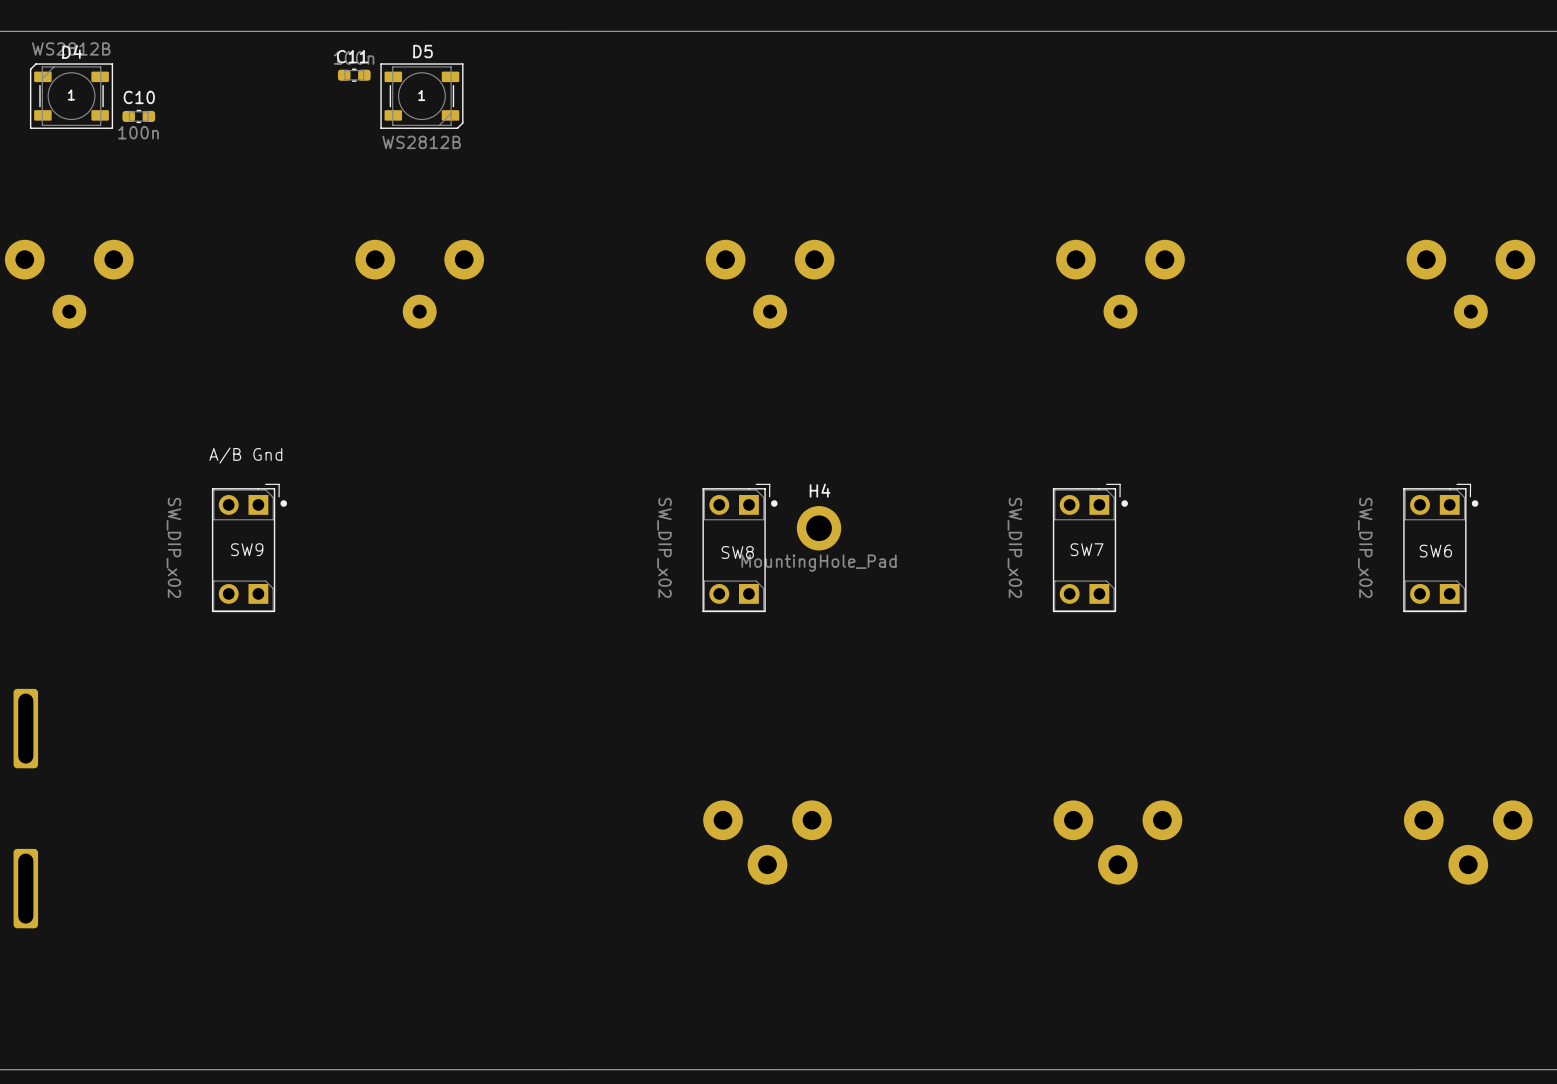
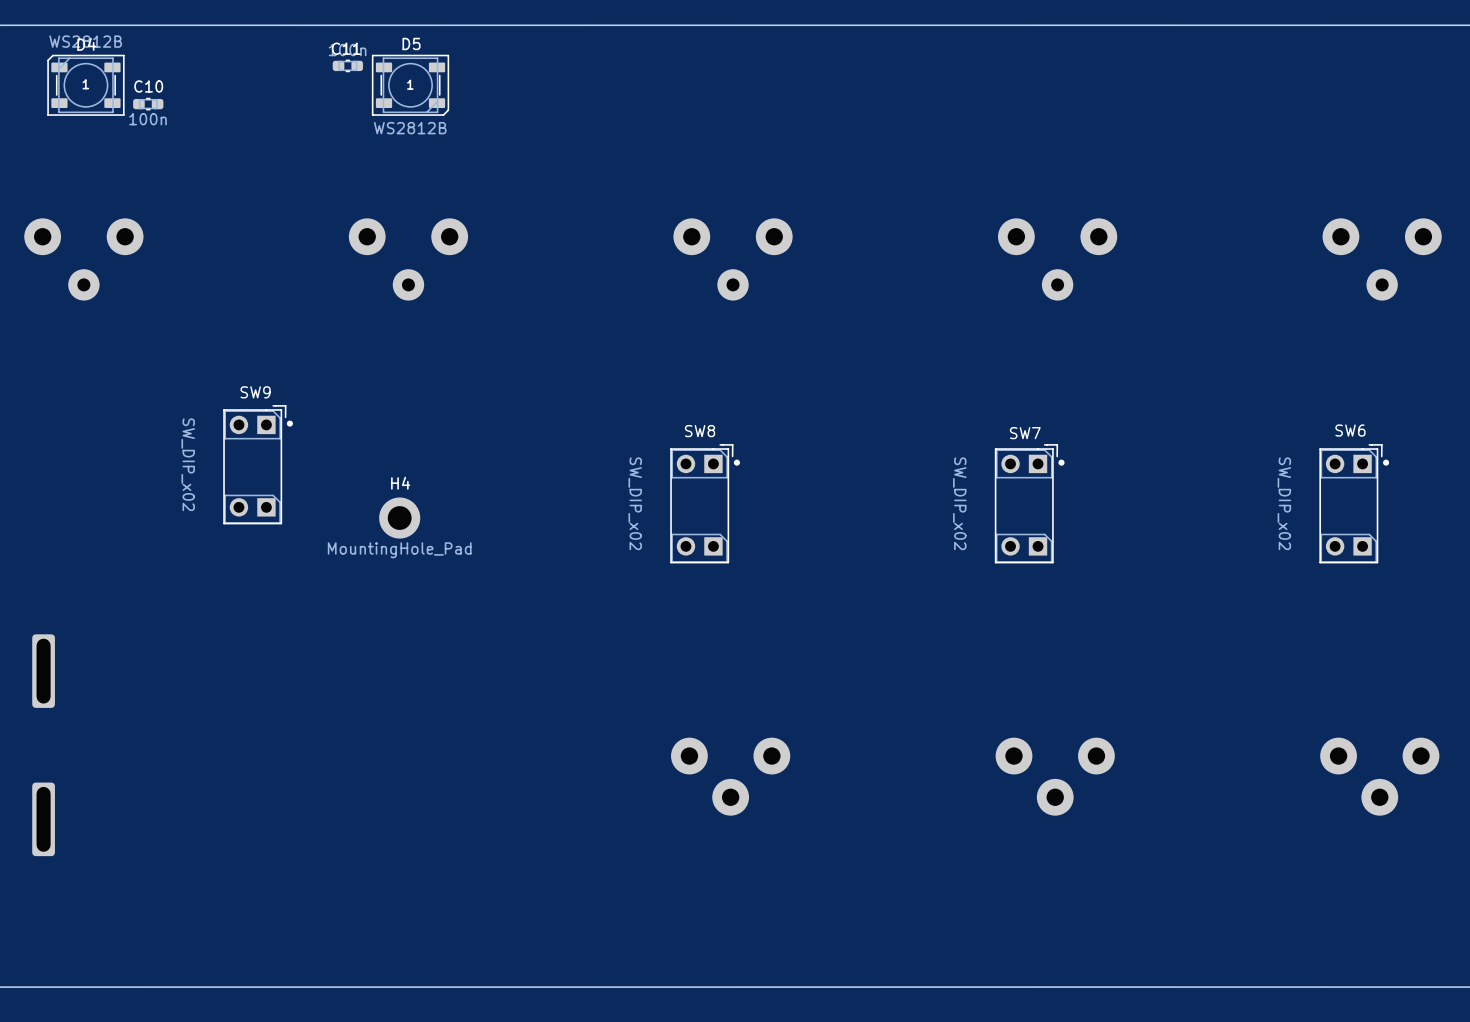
text: A/B Gnd (245, 455) -> none
H4 position: (819, 528) -> (399, 518)
SW9 position: (249, 547) -> (258, 464)
SW9 name position: SW9 (247, 549) -> SW9 (255, 392)
SW7 name position: SW7 (1087, 549) -> SW7 (1025, 433)
SW6 name position: SW6 (1435, 551) -> SW6 (1350, 430)
SW8 name position: SW8 (737, 552) -> SW8 (700, 431)

